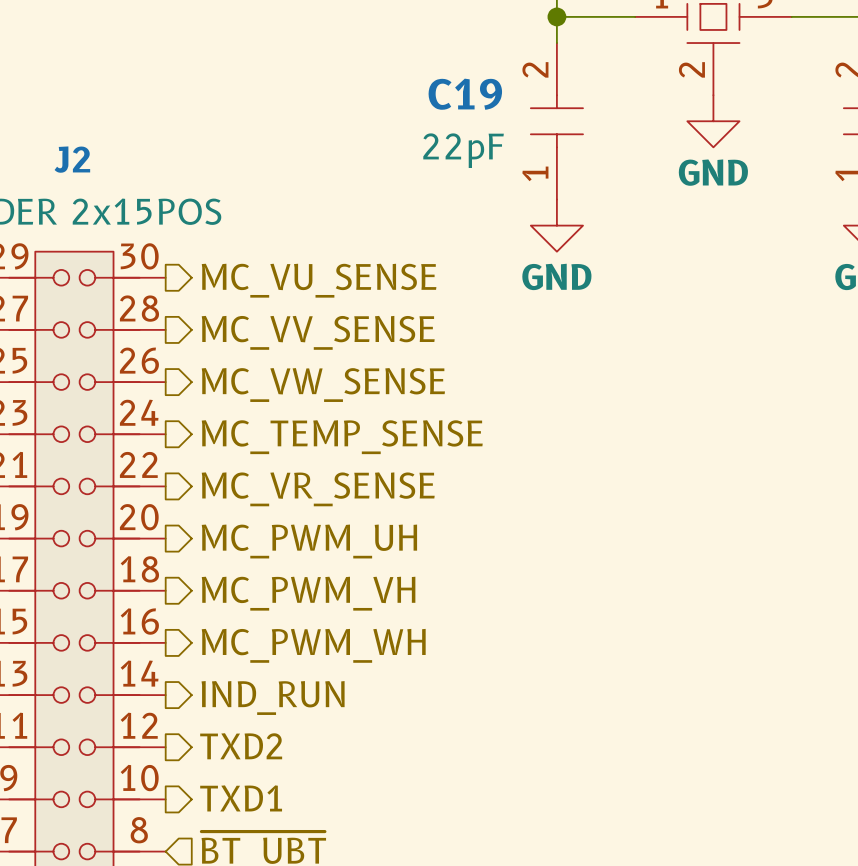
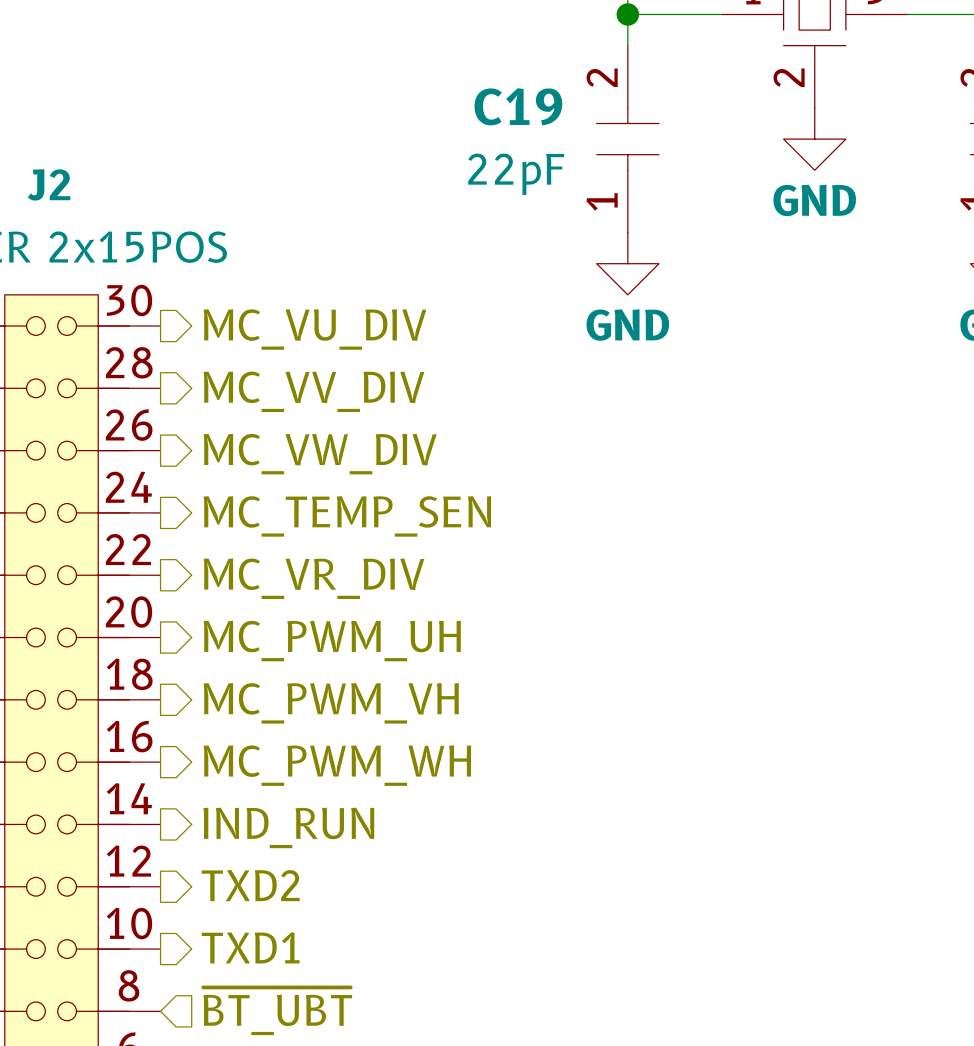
hierarchical label: MC_VU_SENSE (319, 280) -> MC_VU_DIV (315, 329)
hierarchical label: MC_VV_SENSE (318, 332) -> MC_VV_DIV (313, 391)
hierarchical label: MC_VW_SENSE (323, 385) -> MC_VW_DIV (320, 454)
hierarchical label: MC_TEMP_SENSE (342, 437) -> MC_TEMP_SEN (347, 516)
hierarchical label: MC_VR_SENSE (318, 489) -> MC_VR_DIV (313, 578)

